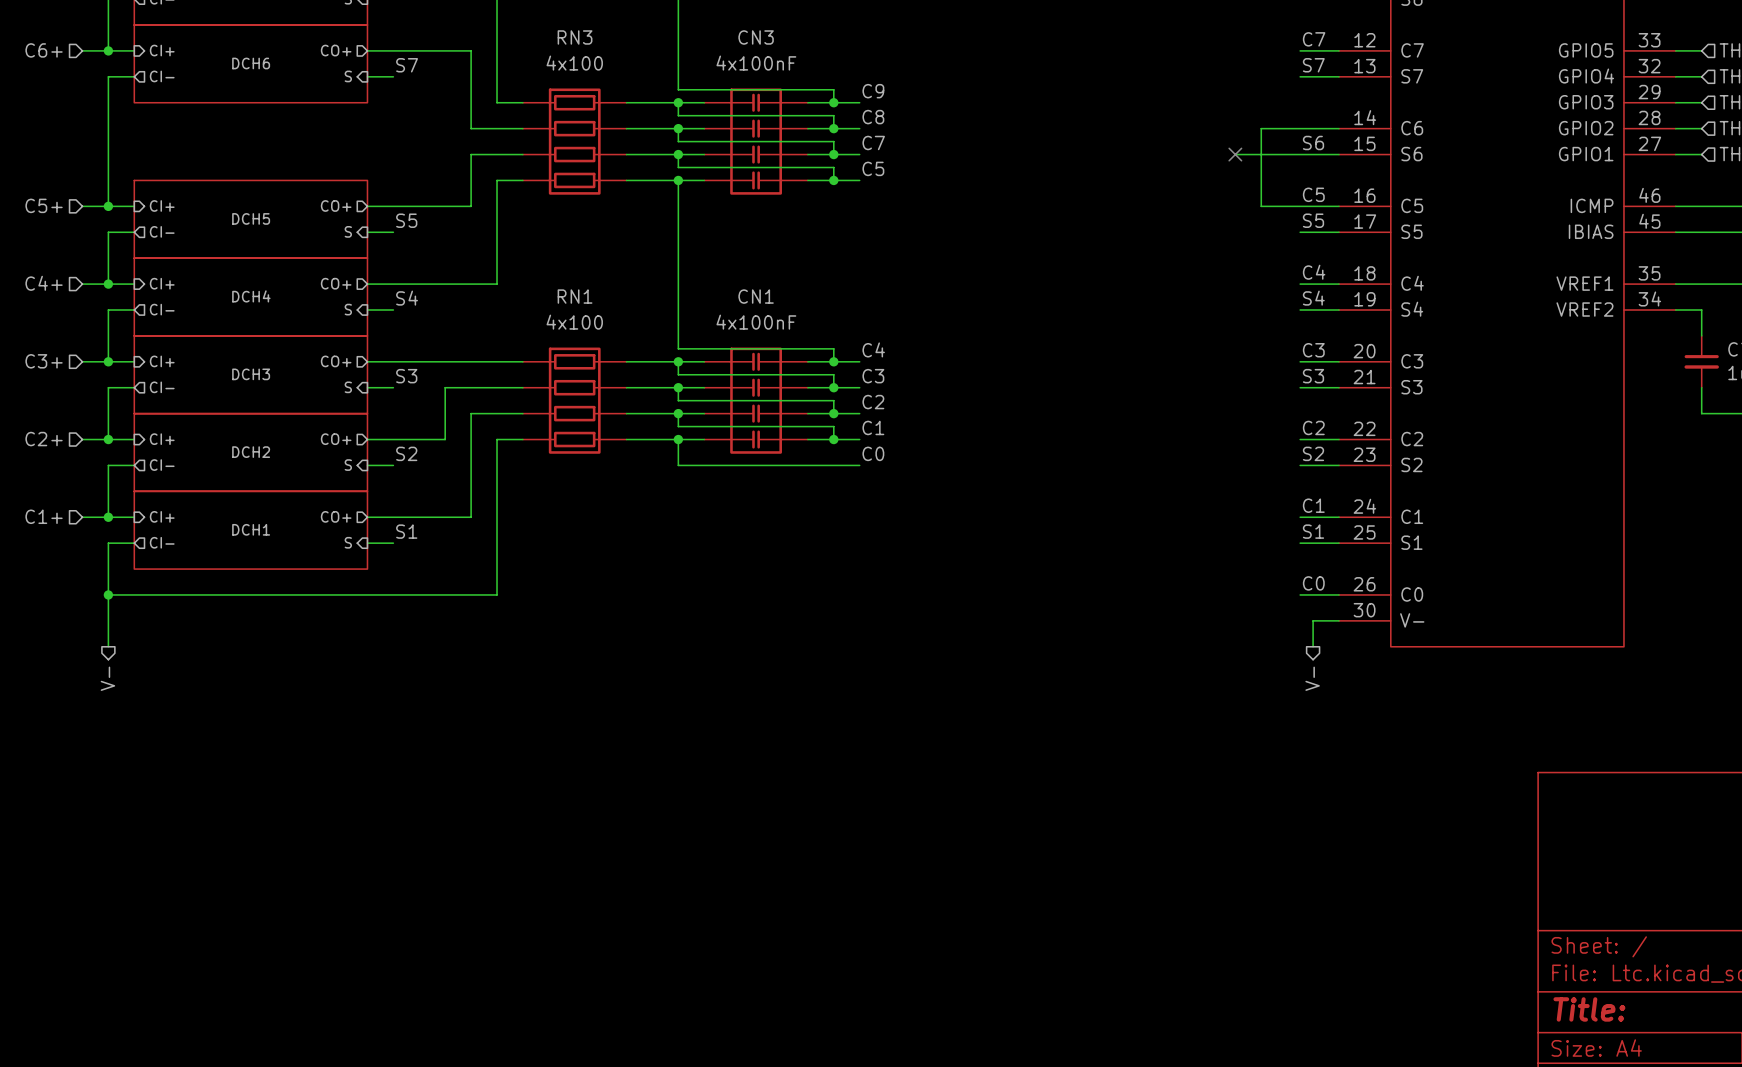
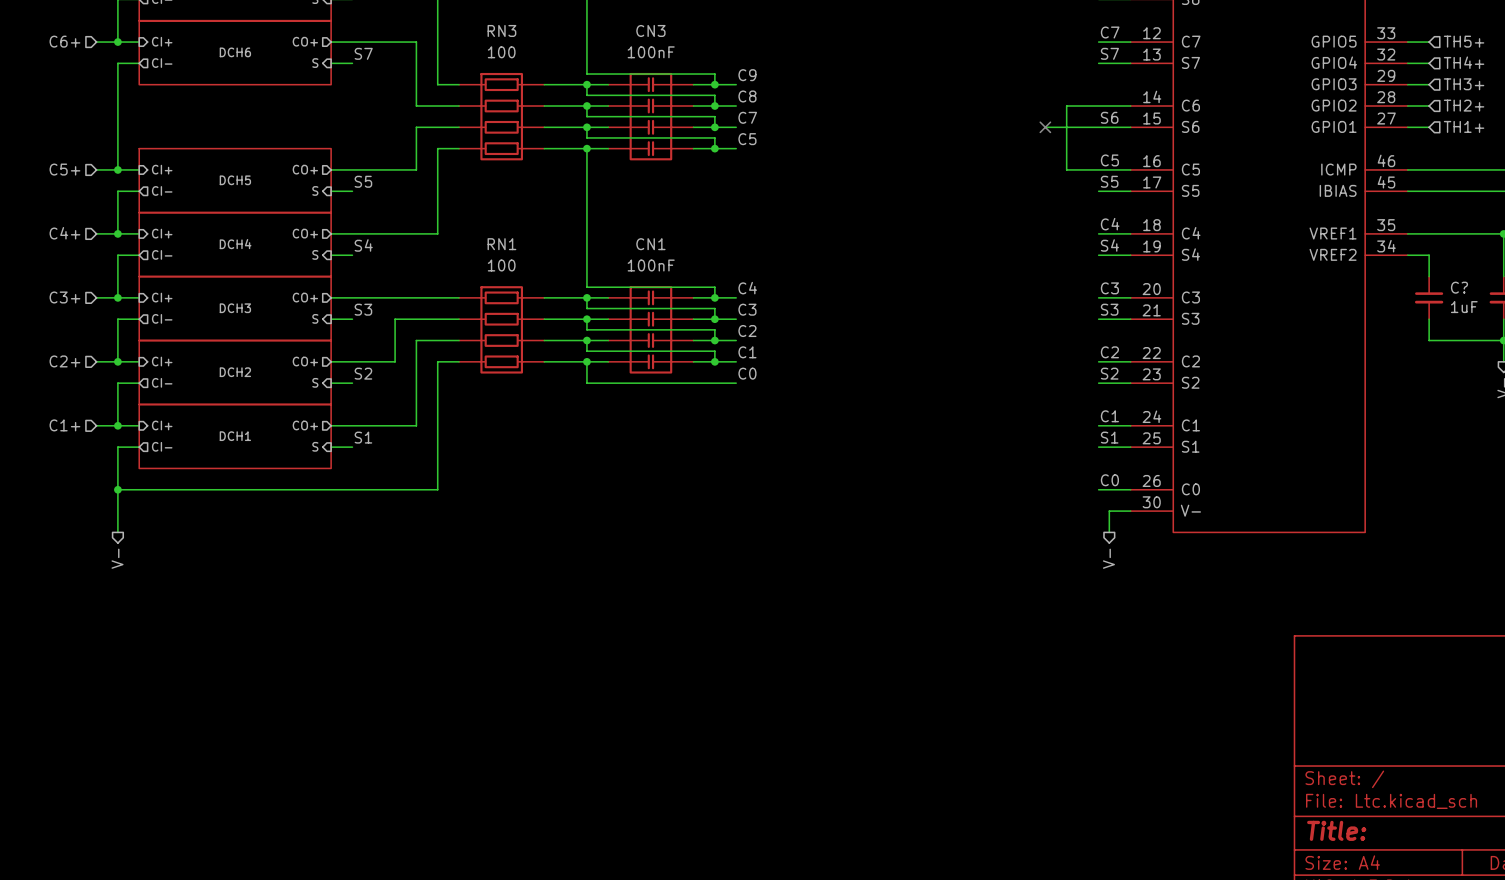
RN3 value: 4x100 (574, 63) -> 100 (501, 52)
CN3 value: 4x100nF (756, 63) -> 100nF (651, 52)
RN1 value: 4x100 (574, 322) -> 100 (501, 265)
CN1 value: 4x100nF (756, 322) -> 100nF (651, 265)

